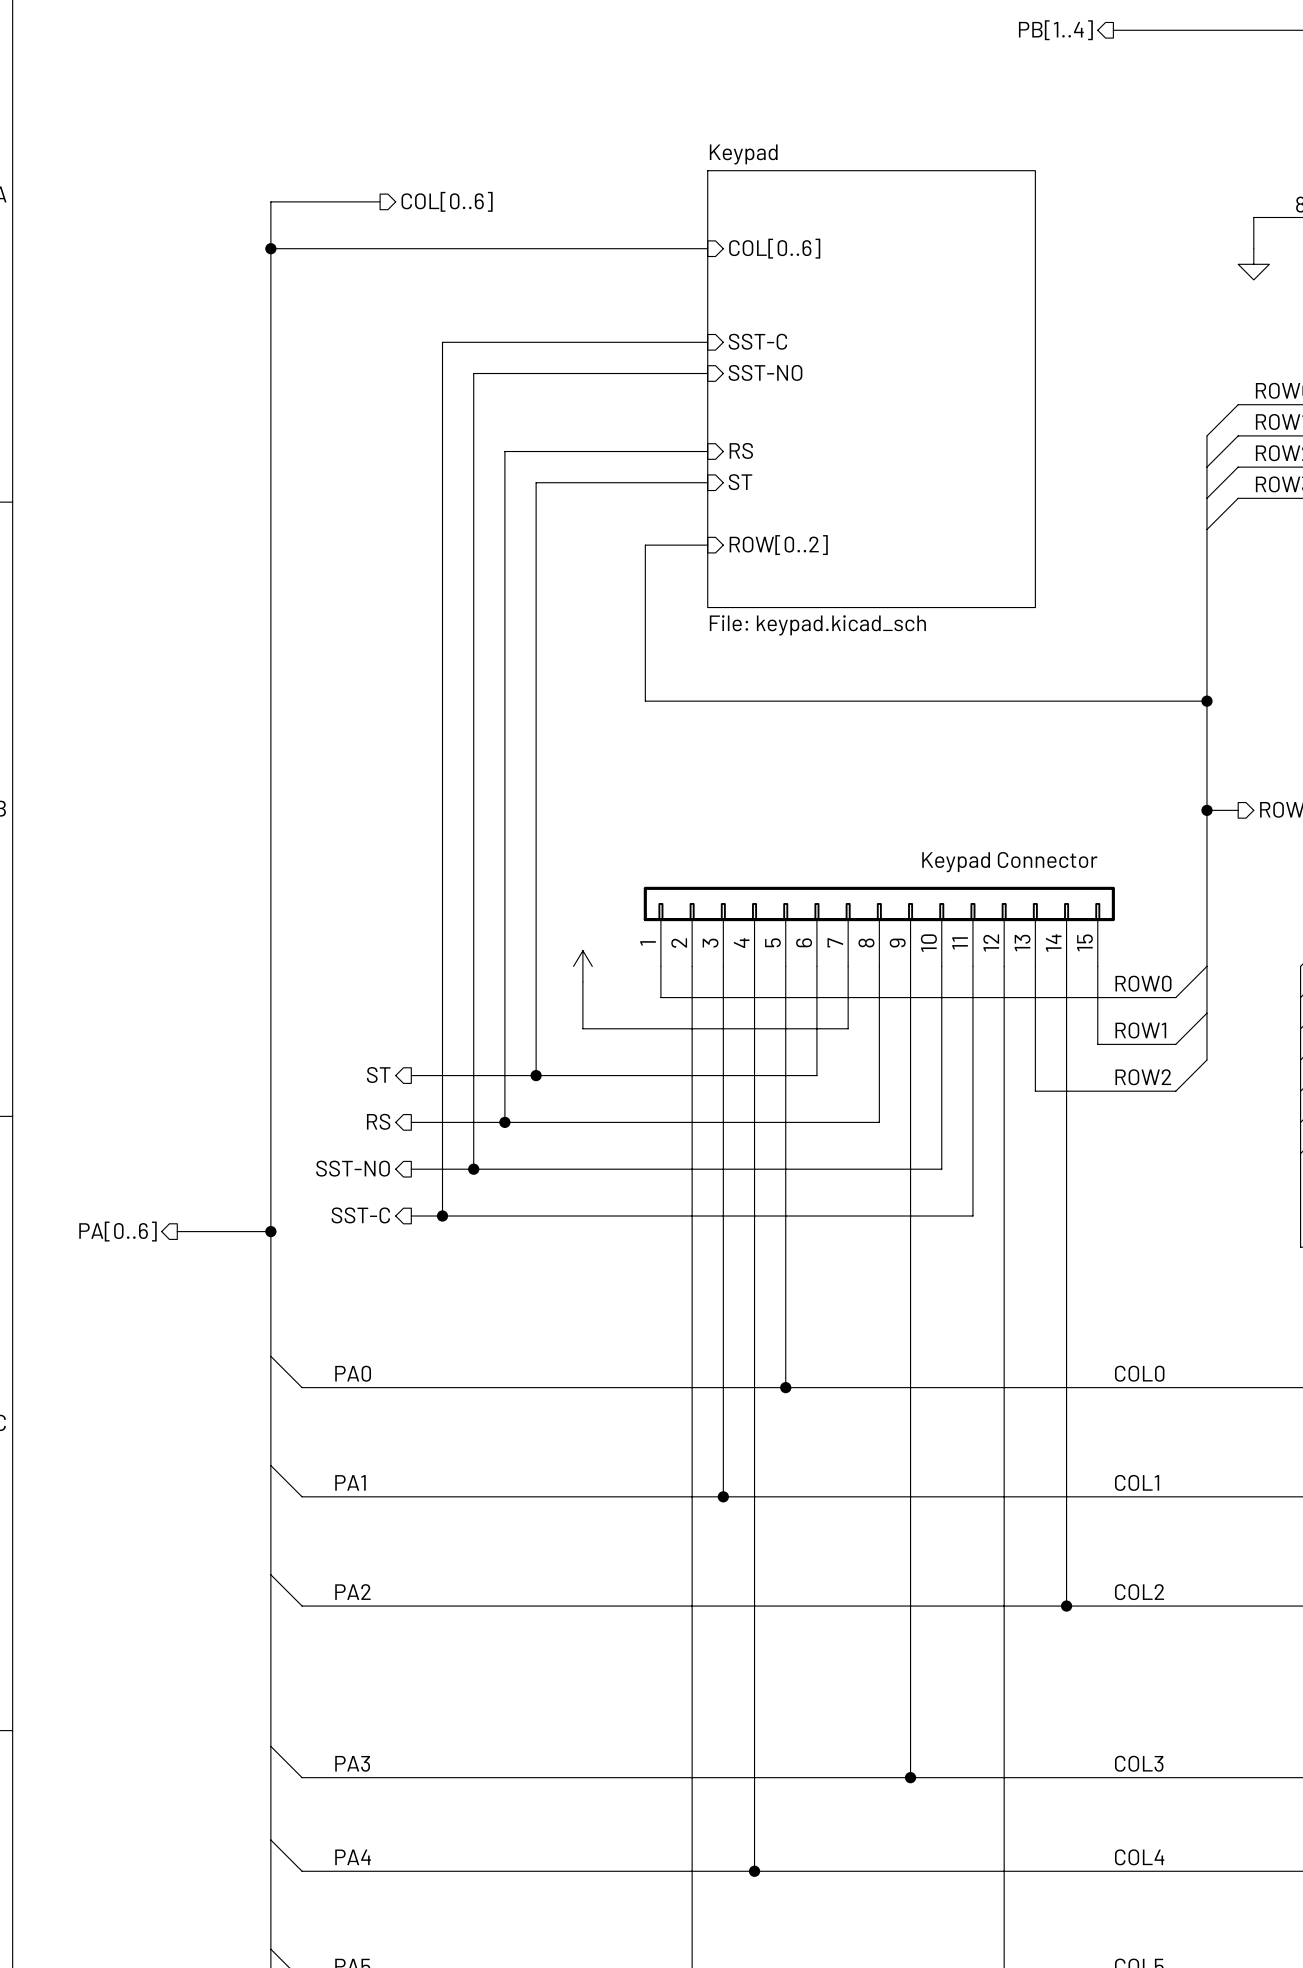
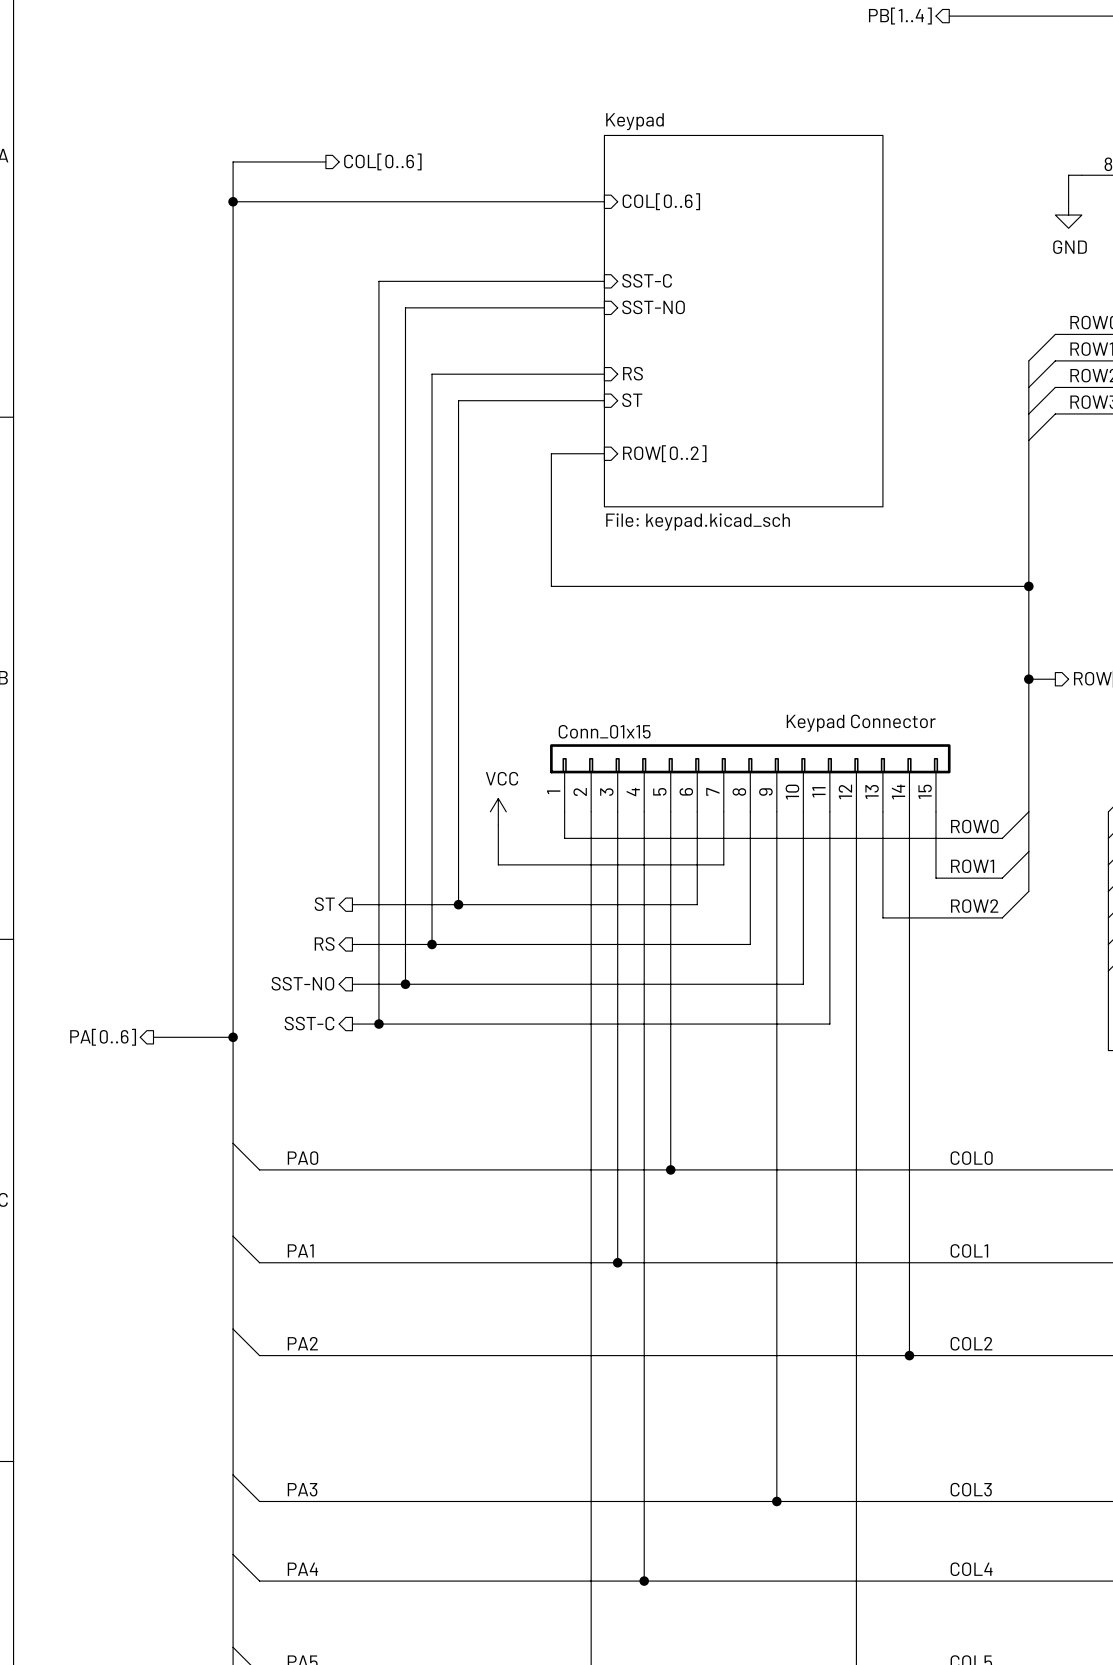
power symbol text: none -> GND (1070, 247)
part value: none -> Conn_01x15 (604, 731)
power symbol text: none -> VCC (502, 778)

